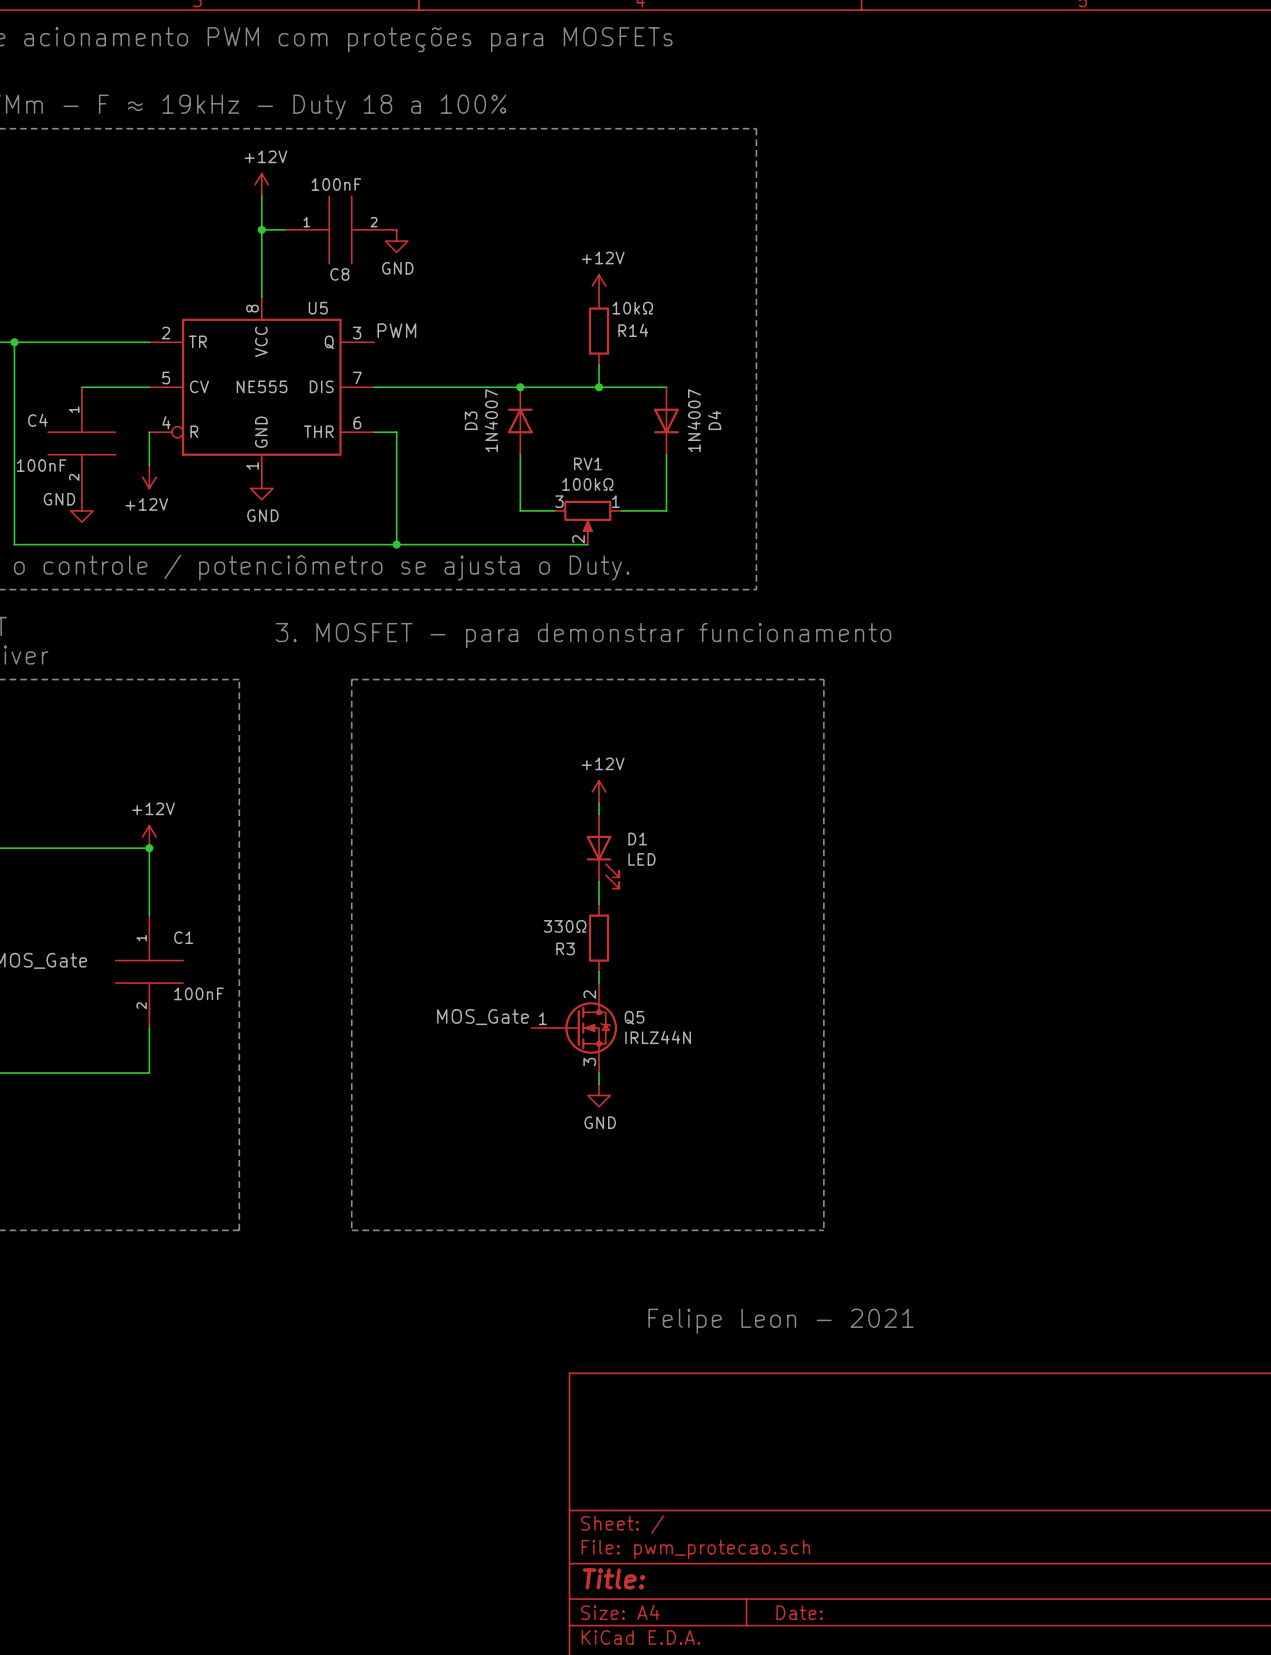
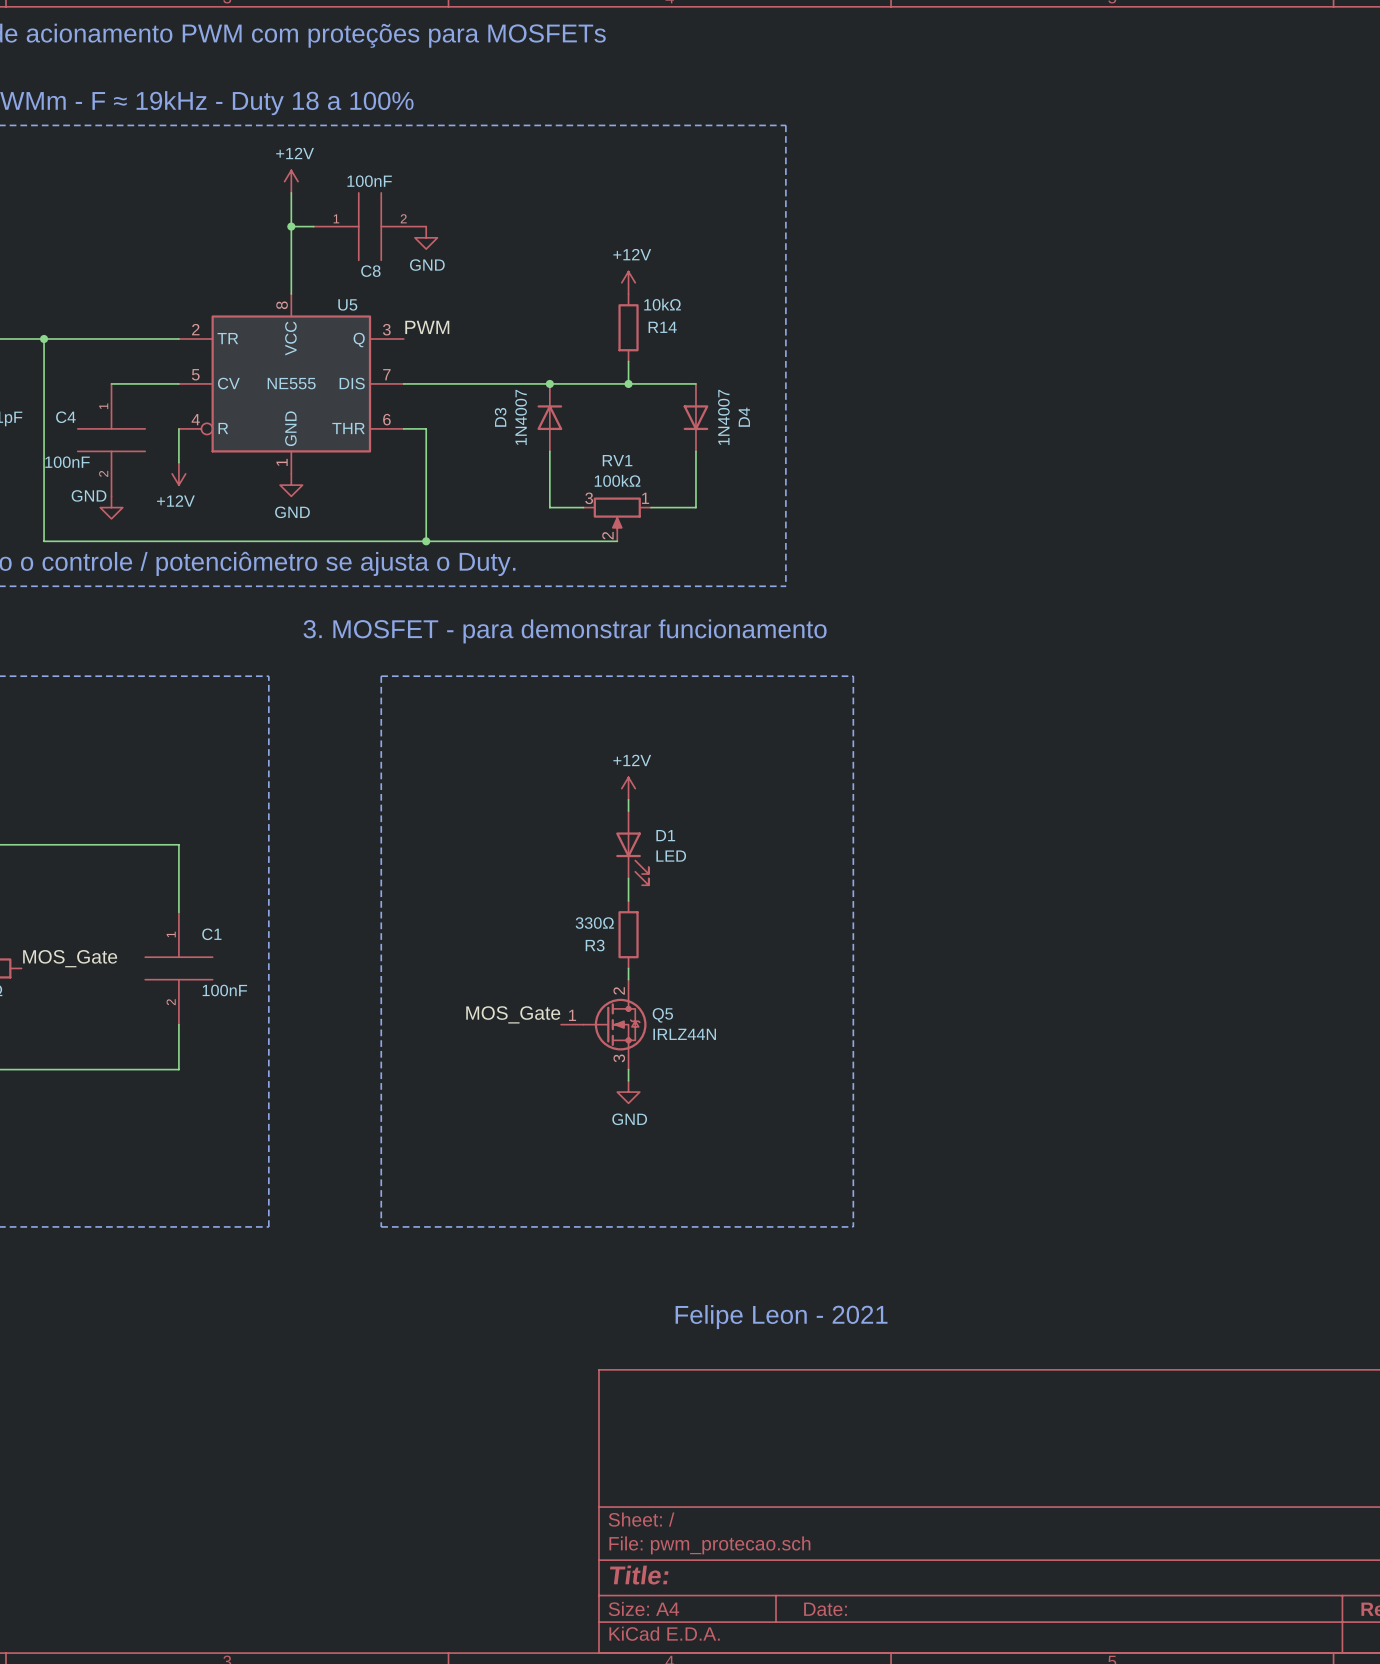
power symbol: +12V (149, 836) -> none
junction: (149, 848) -> none

